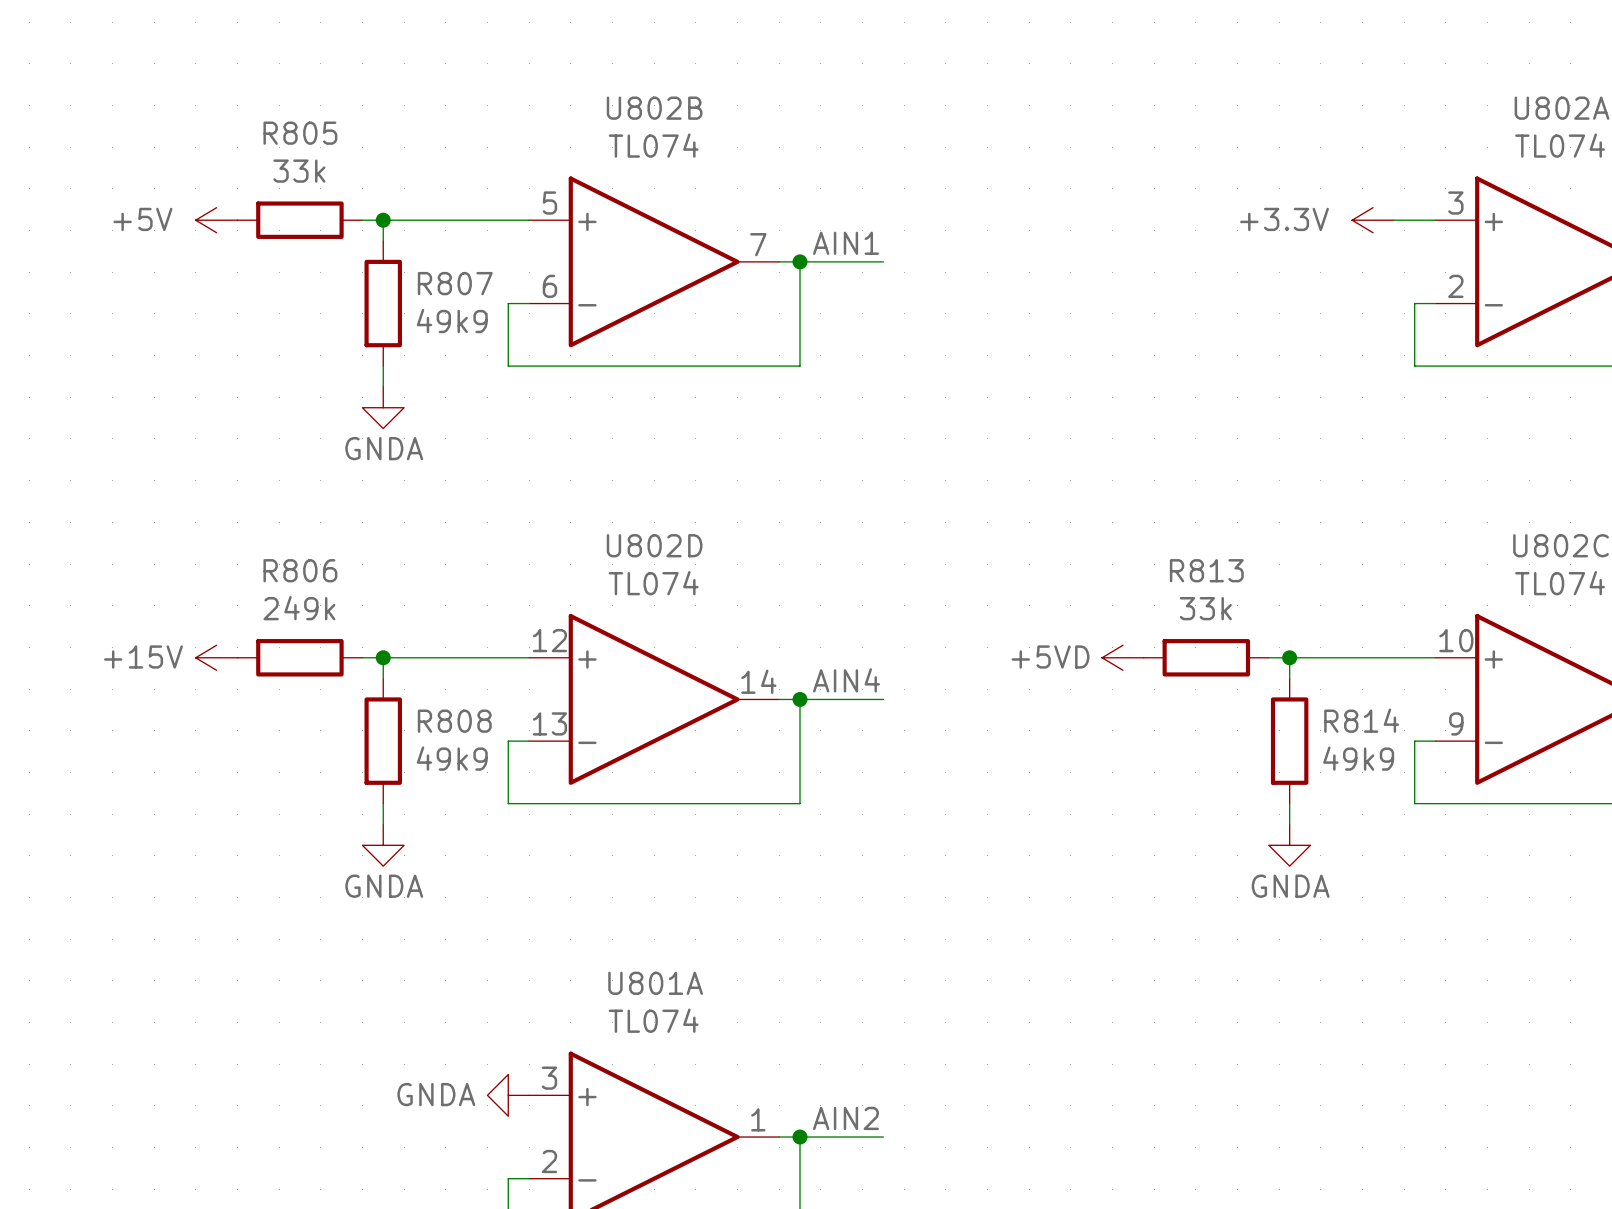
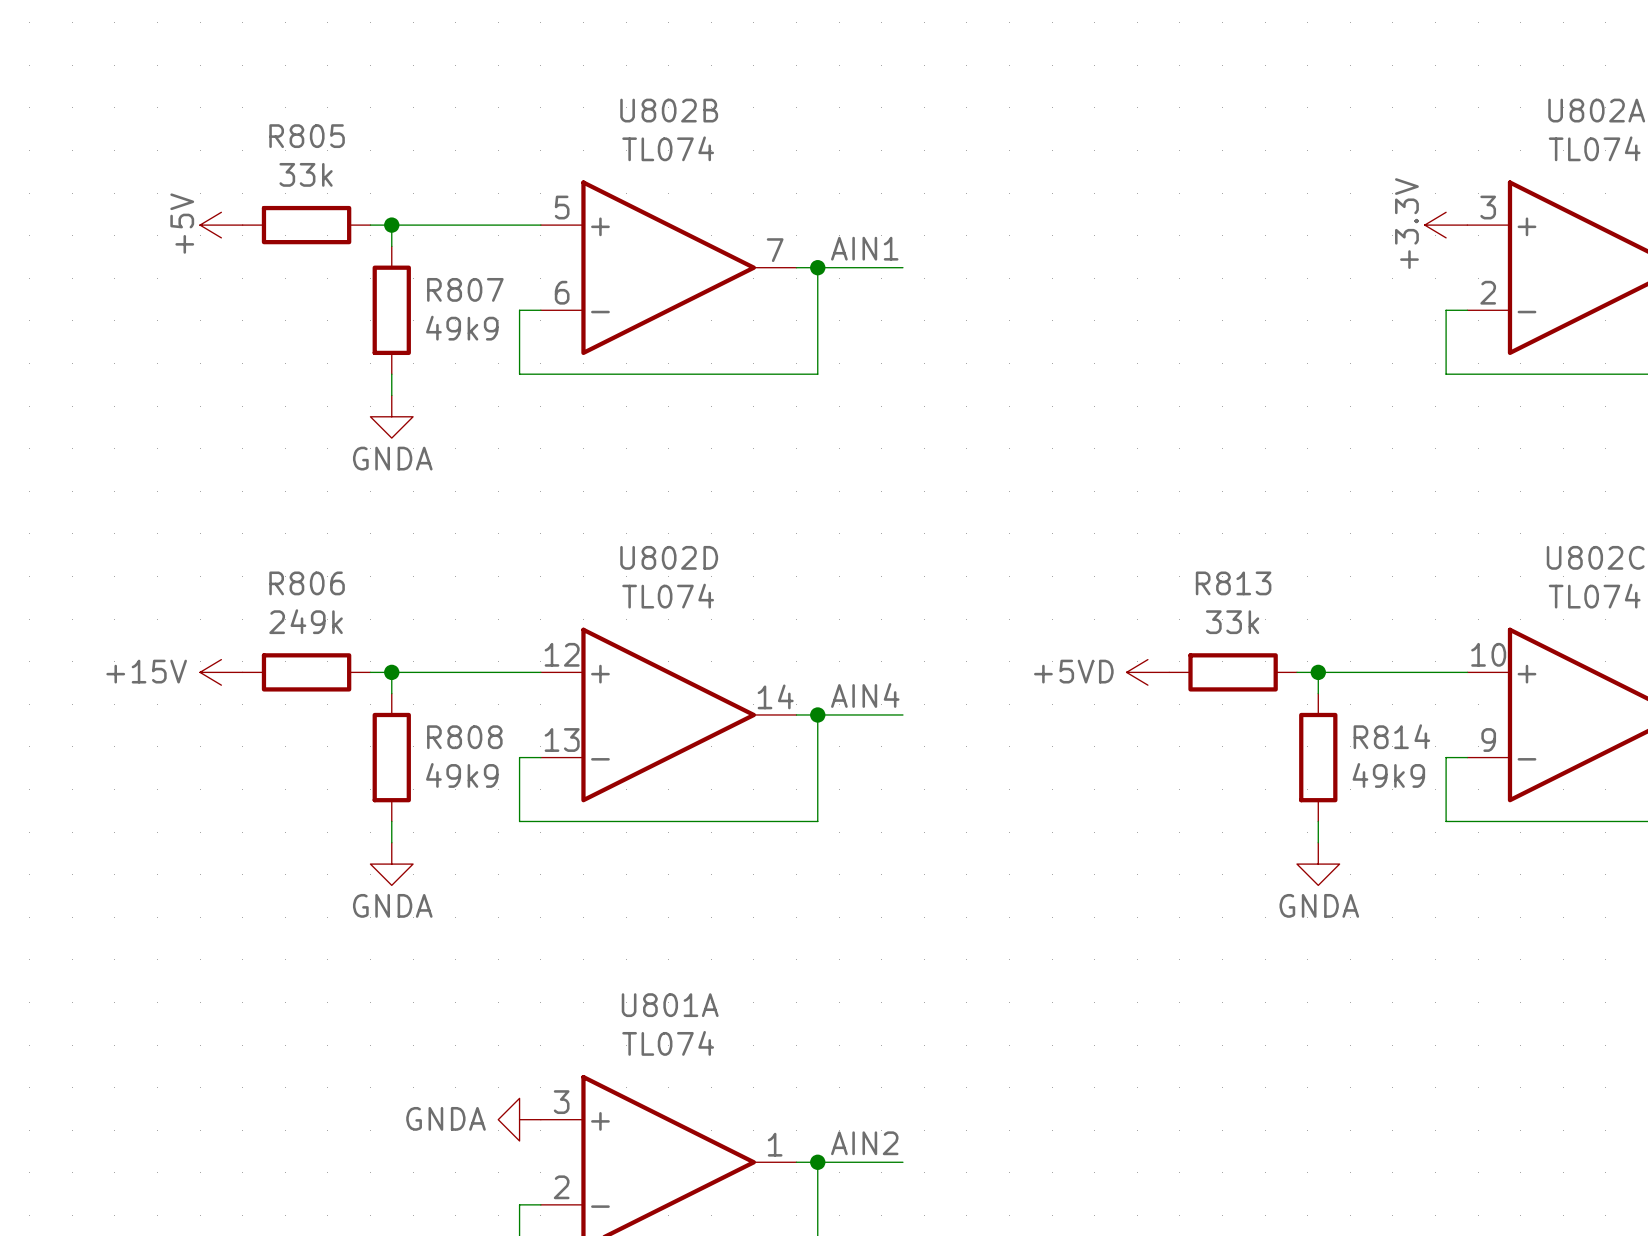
power symbol text rotation: 0° (142, 219) -> 90° counterclockwise (182, 223)
power symbol text rotation: 0° (1284, 219) -> 90° counterclockwise (1406, 223)
power symbol position: +3.3V (1373, 220) -> +3.3V (1446, 225)

